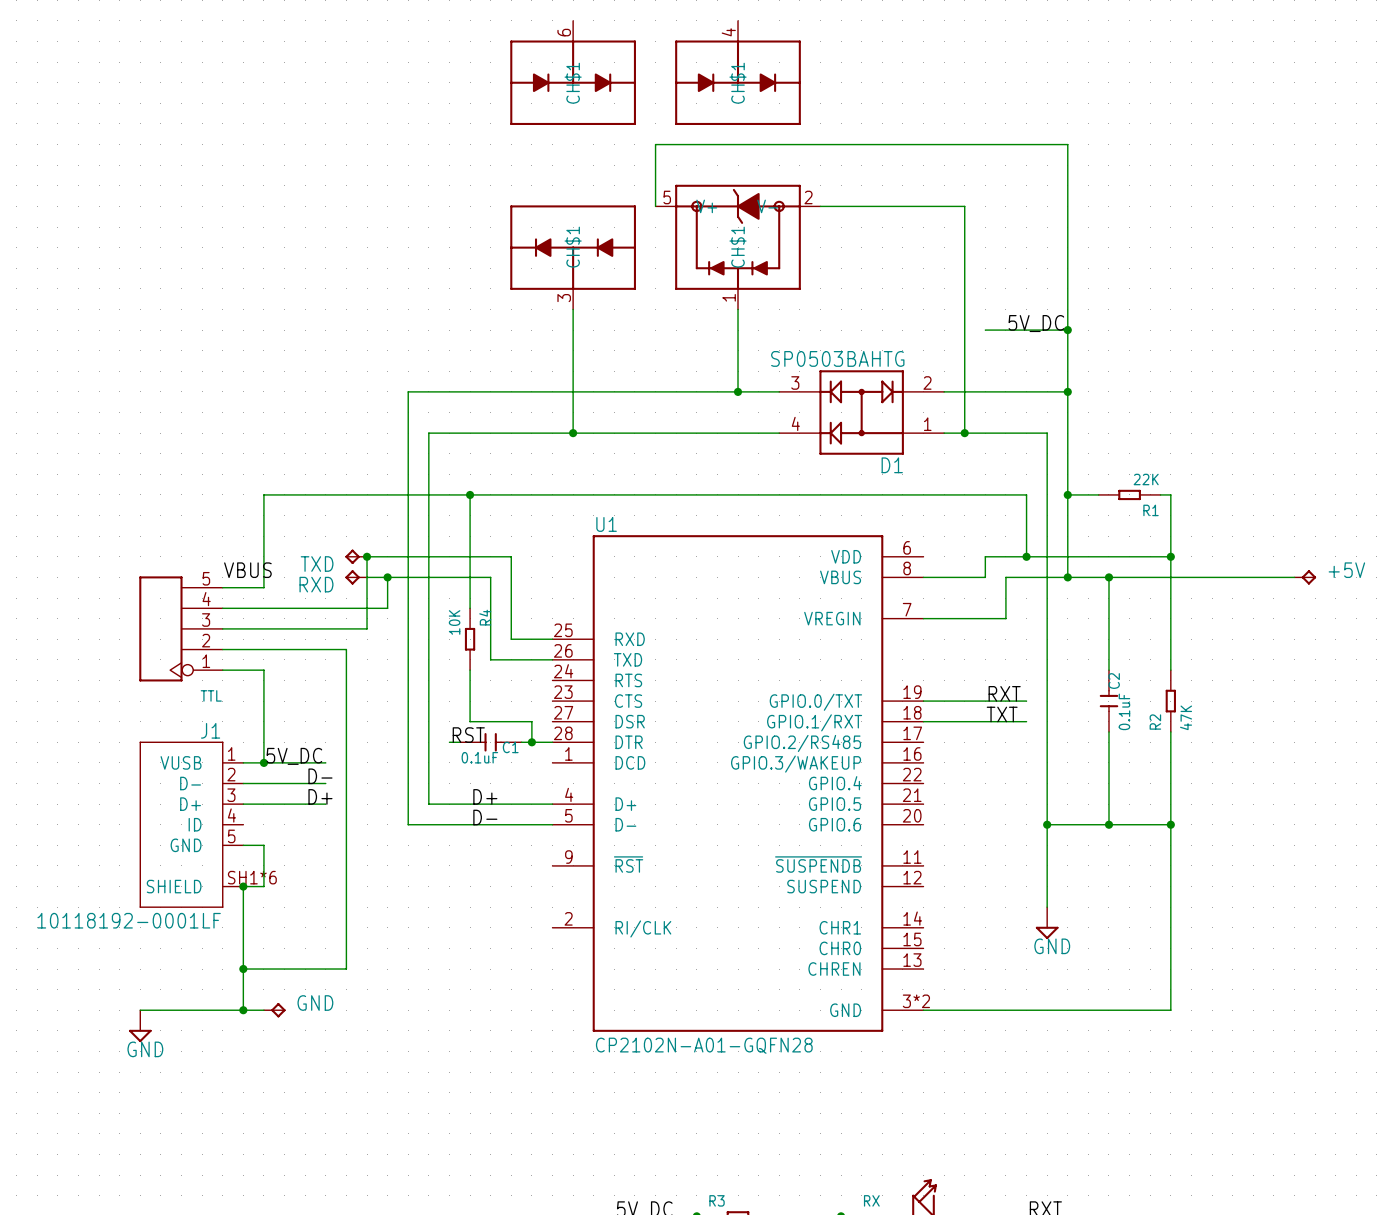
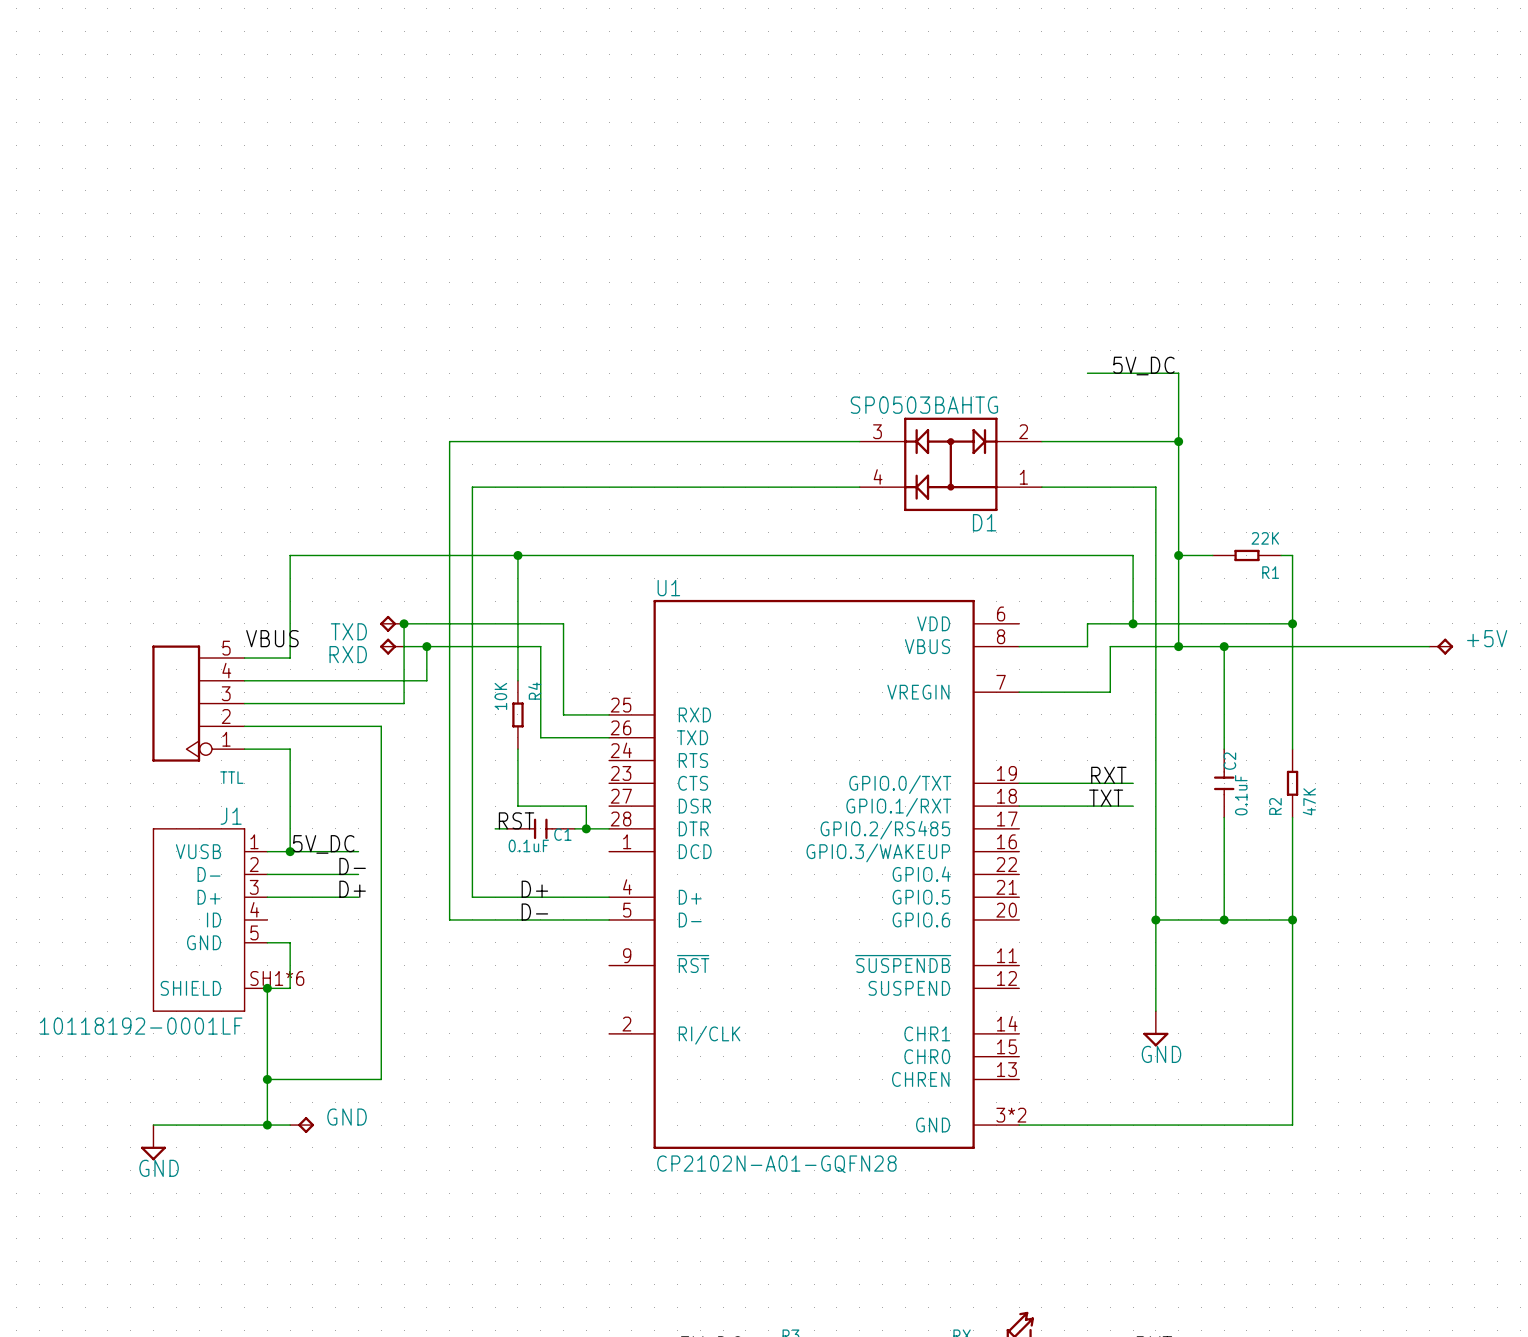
part: (573, 72) -> none
part: (738, 72) -> none
wire: (655, 206) (655, 144) (1067, 144) (1067, 330) -> none
wire: (820, 206) (964, 206) (964, 433) -> none
part: (738, 247) -> none
part: (573, 257) -> none
wire: (573, 309) (573, 433) -> none
wire: (738, 309) (738, 391) -> none
junction: (1067, 330) -> none
junction: (738, 391) -> none
junction: (573, 433) -> none
junction: (964, 433) -> none

